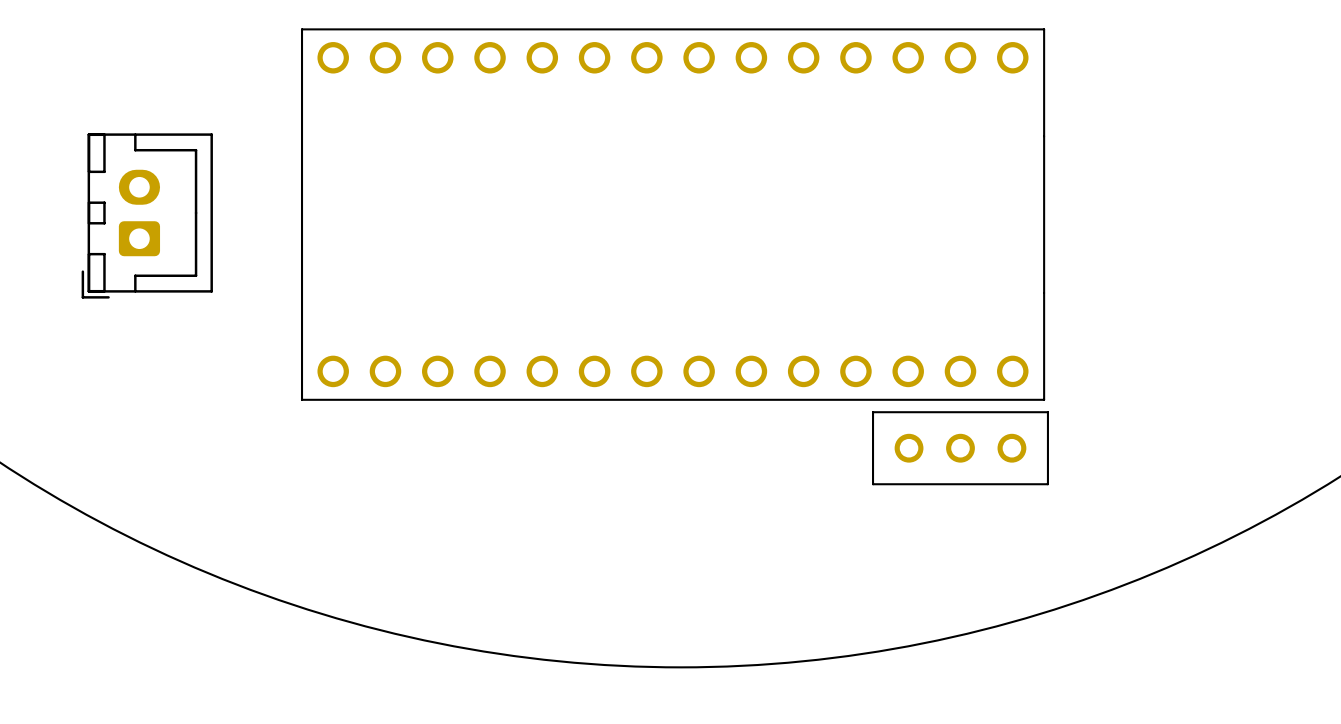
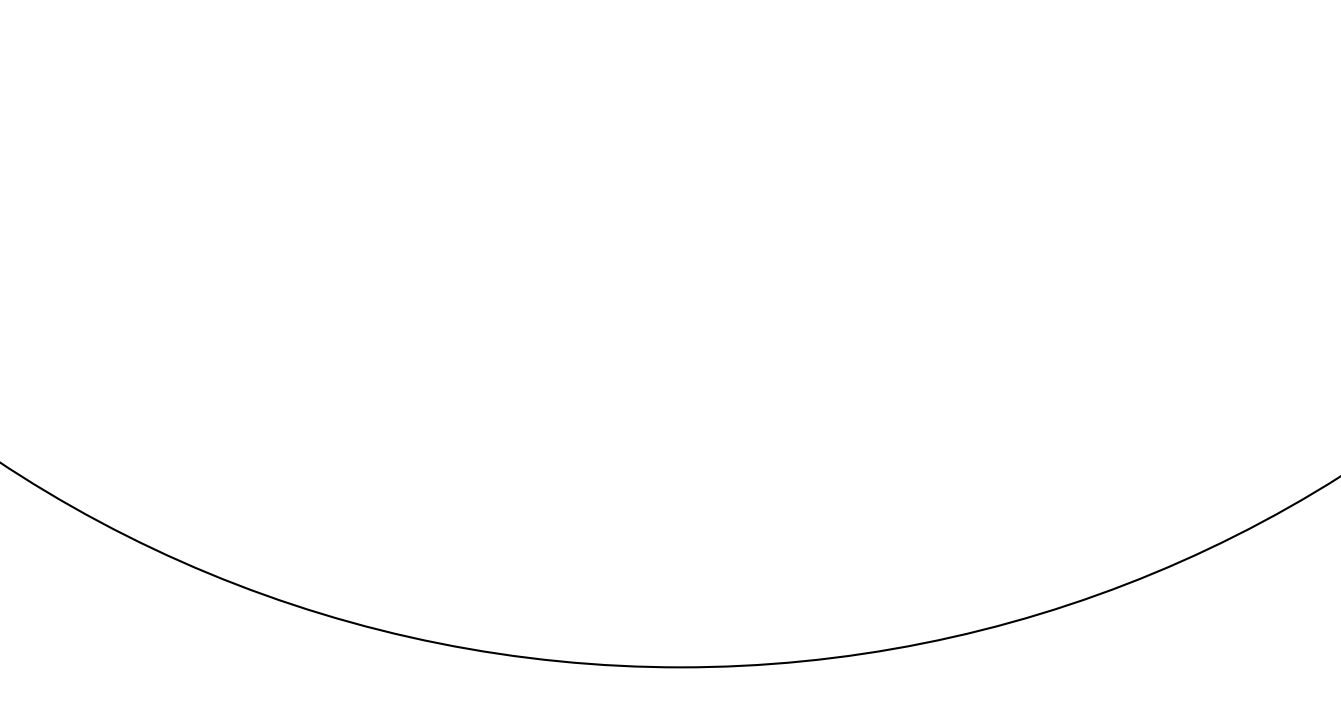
part: (673, 214) -> none
part: (147, 215) -> none
part: (960, 448) -> none

